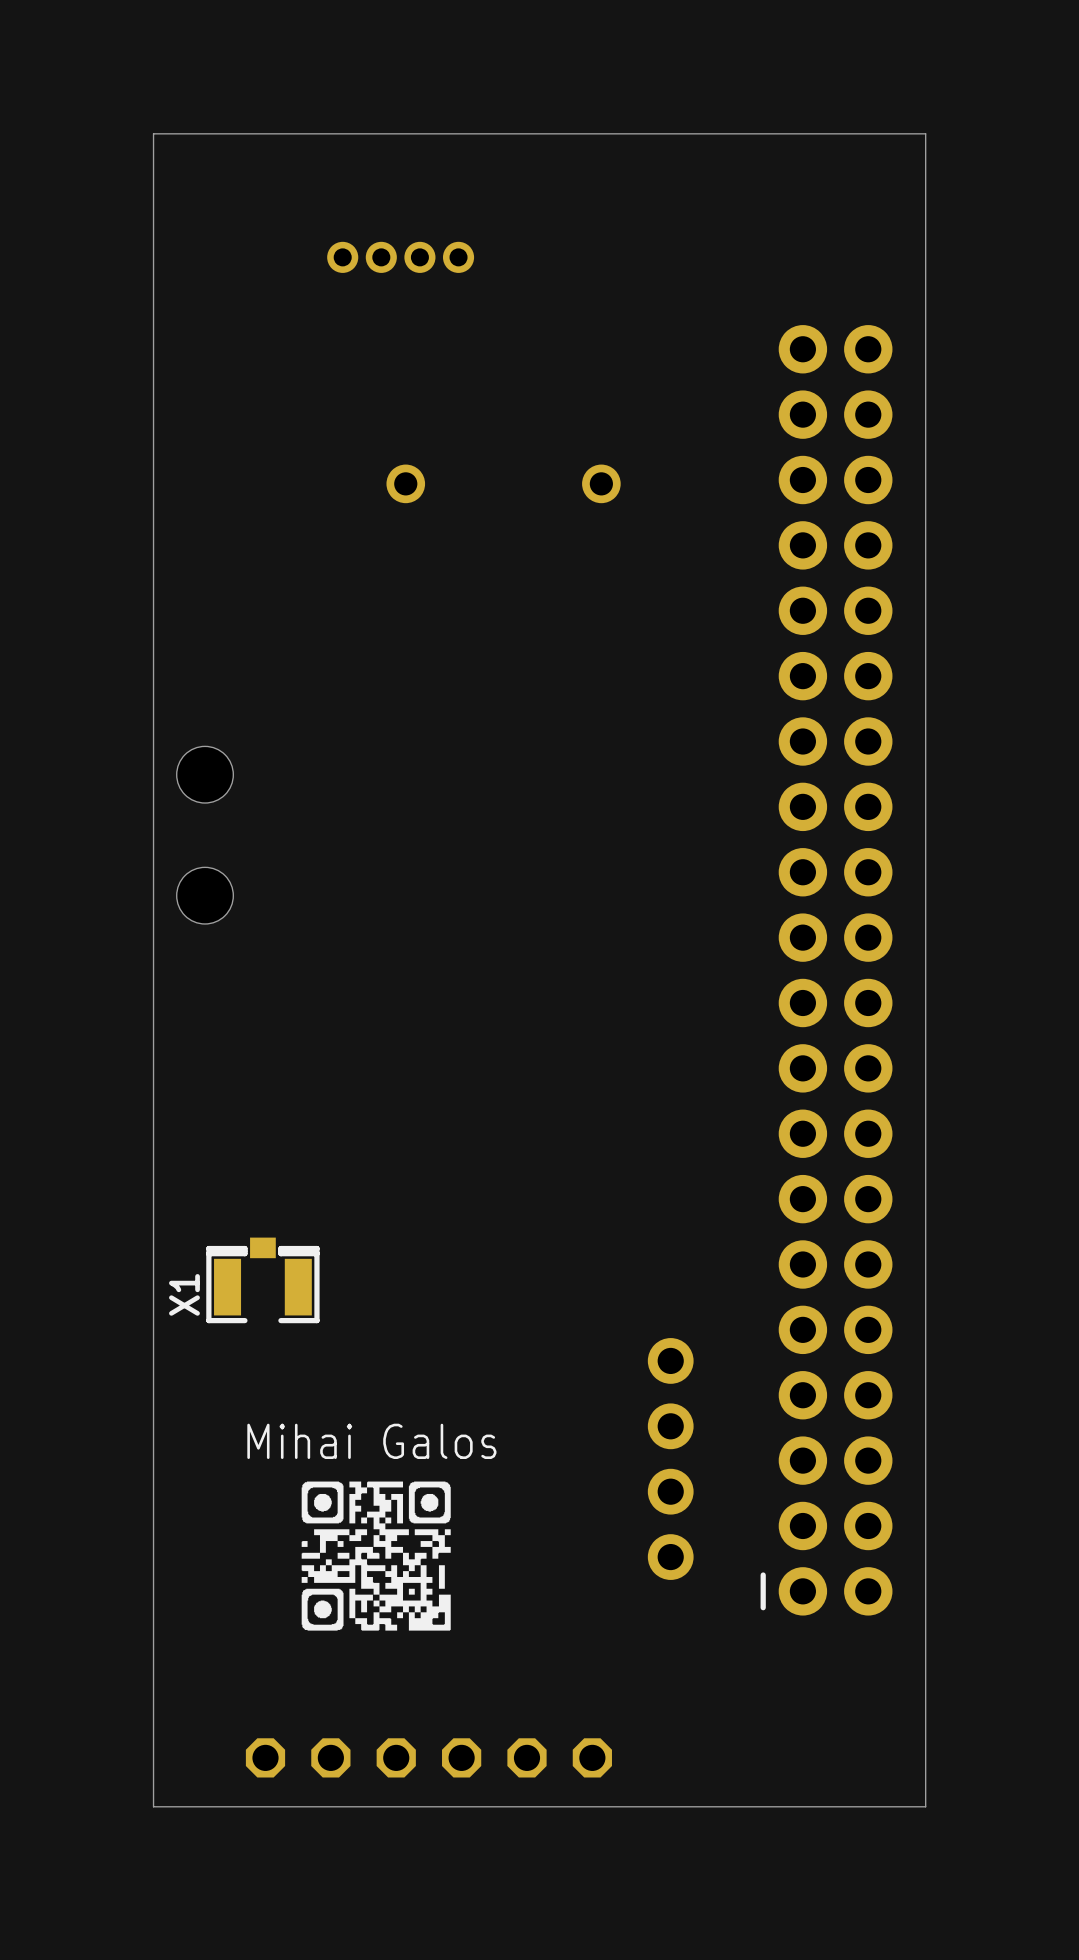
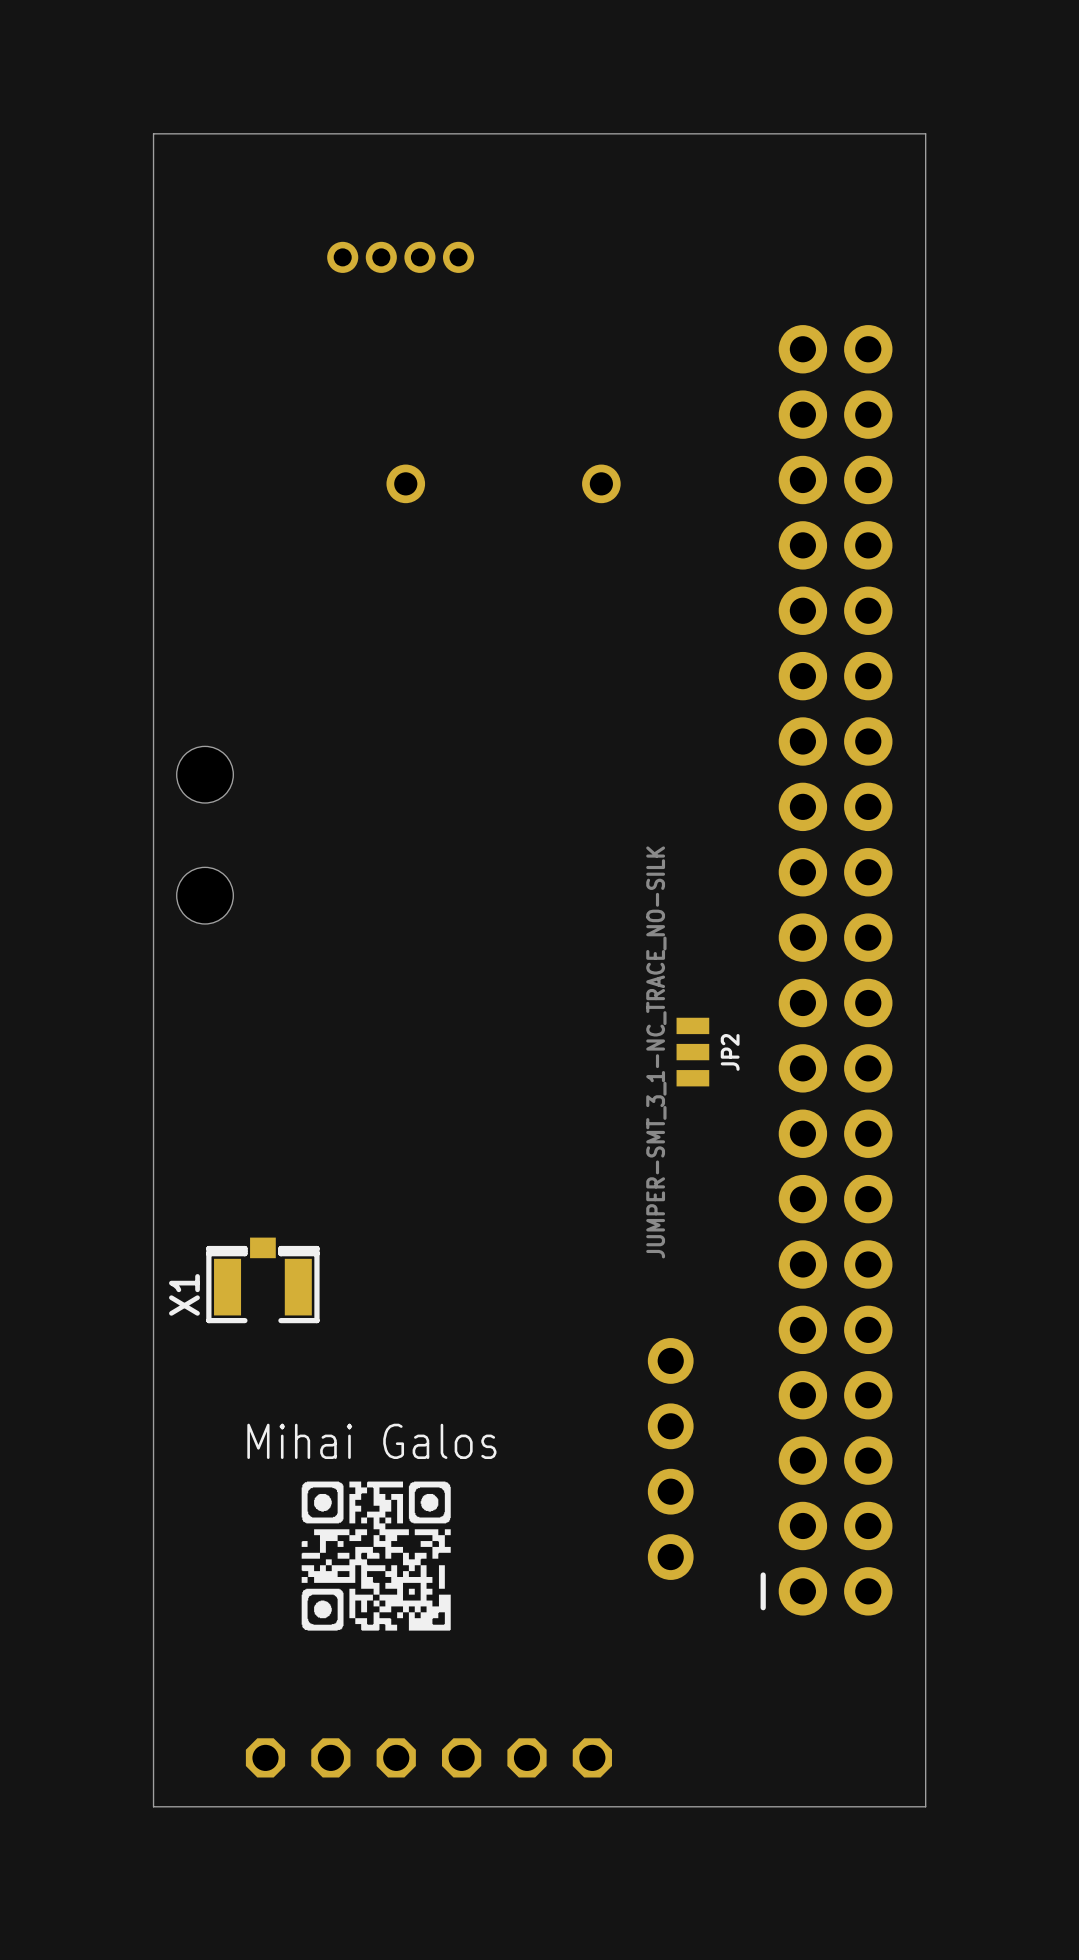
JP2: none -> JUMPER-SMT_3_1-NC_TRACE_NO-SILK (692, 1052)

